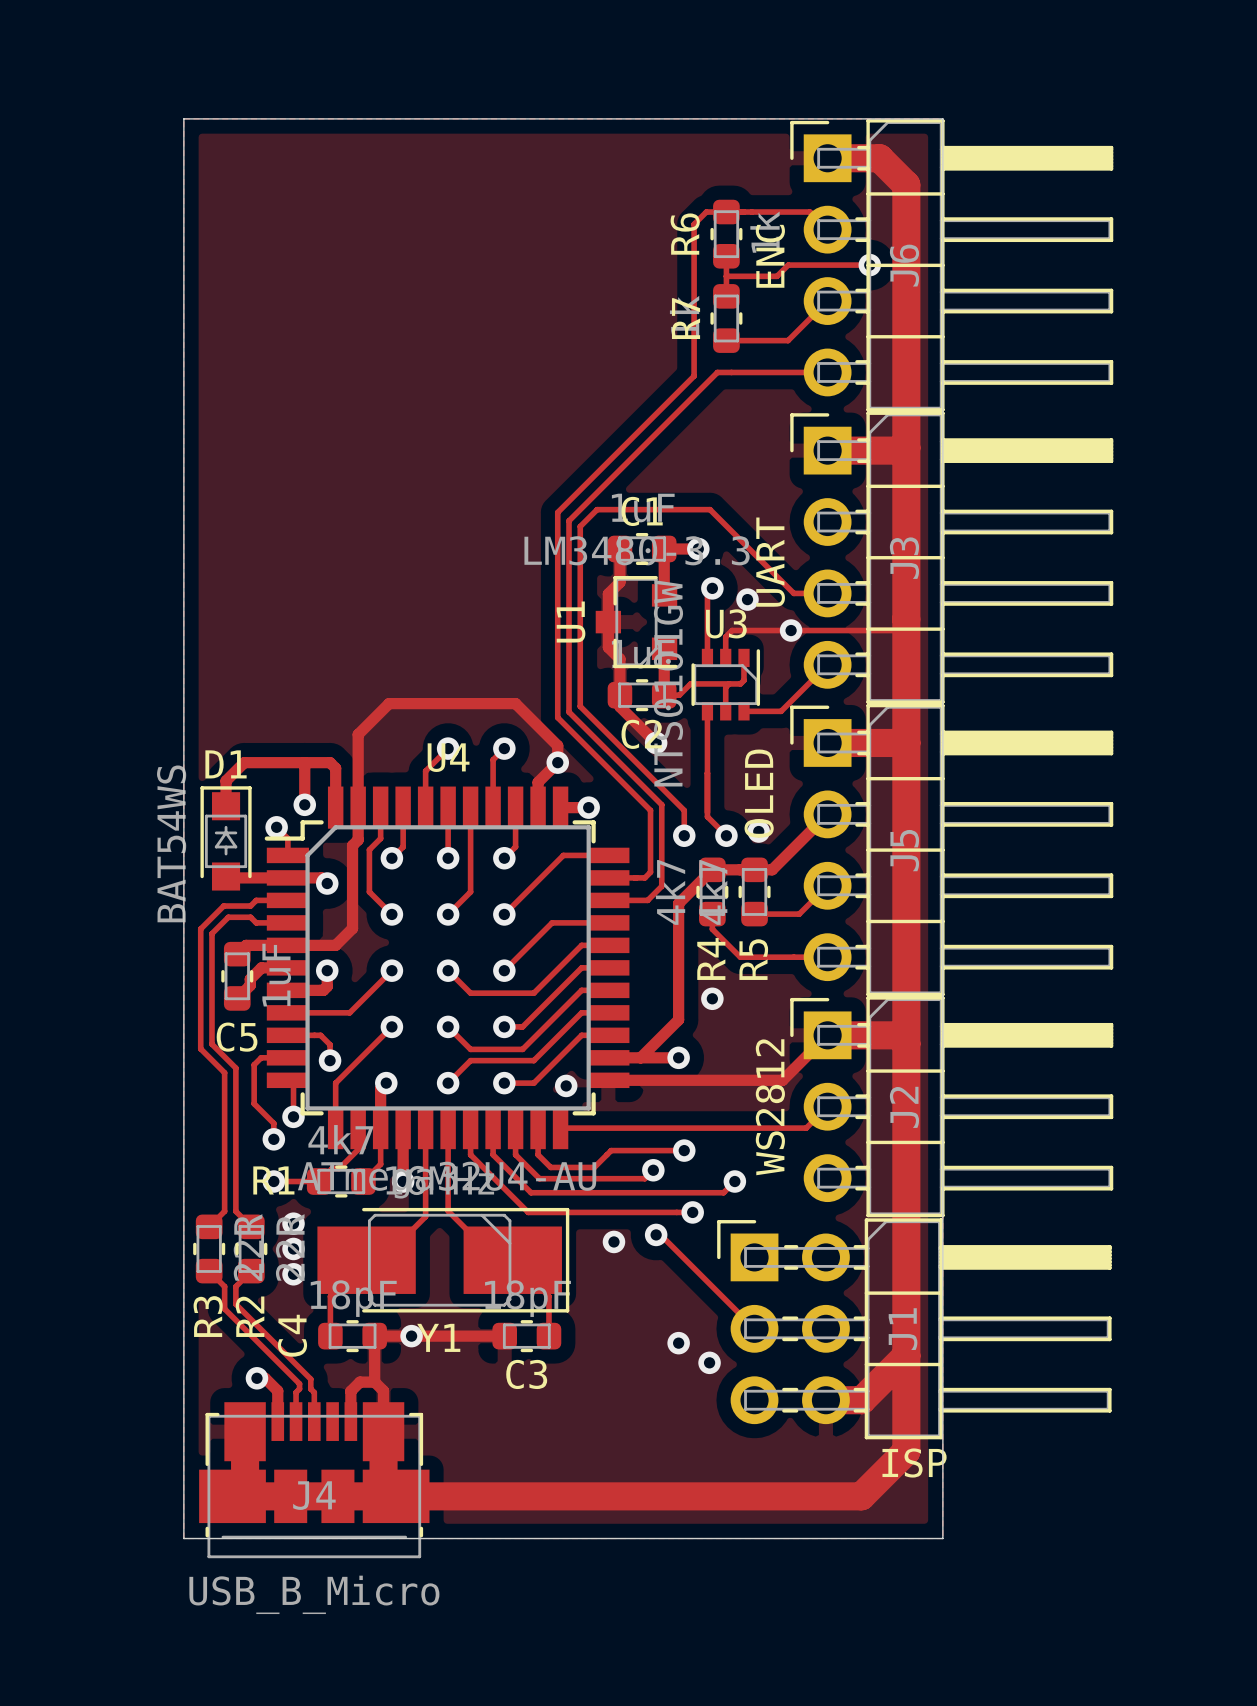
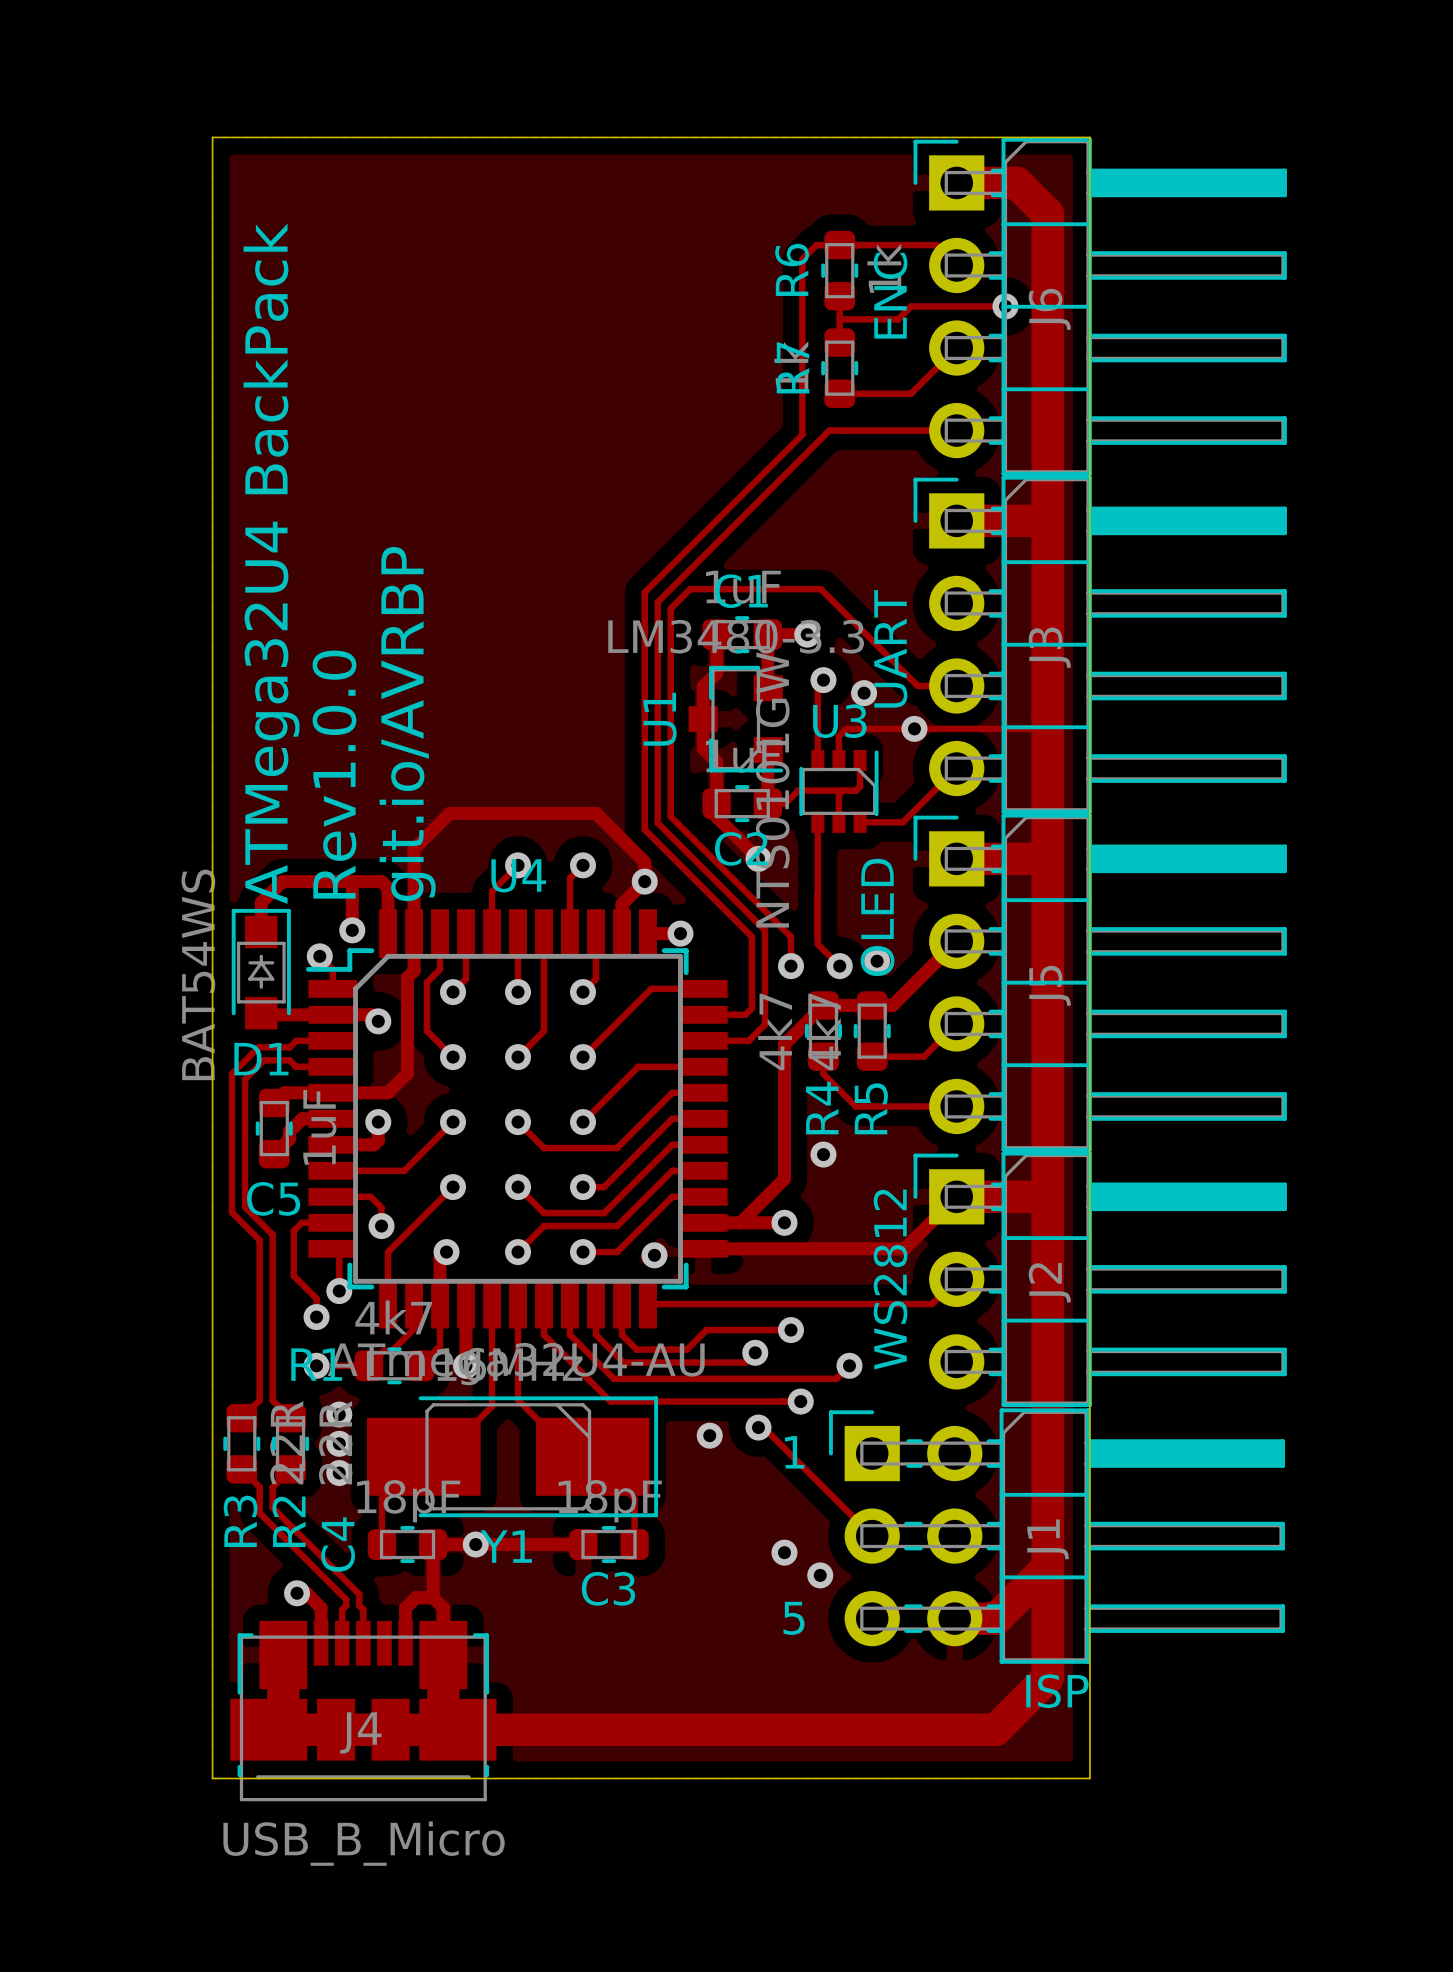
text: none -> ATMega32U4 BackPack (271, 563)
text: none -> git.io/AVRBP (407, 724)
text: none -> Rev1.0.0 (334, 774)
D1 name position: D1 (226, 764) -> D1 (261, 1059)
text: none -> 1 (794, 1452)
text: none -> 5 (794, 1618)

